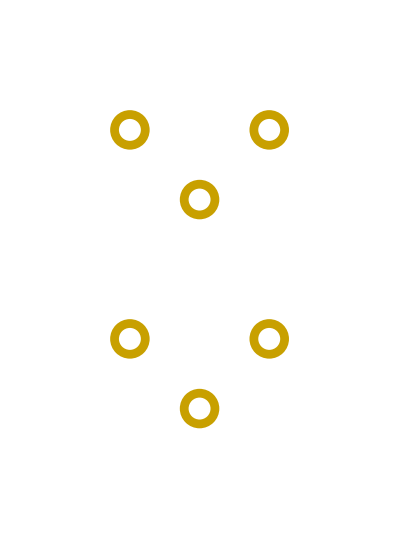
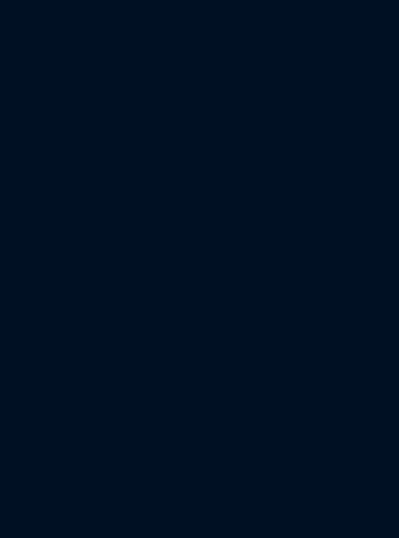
part: (199, 164) -> none
part: (199, 373) -> none

